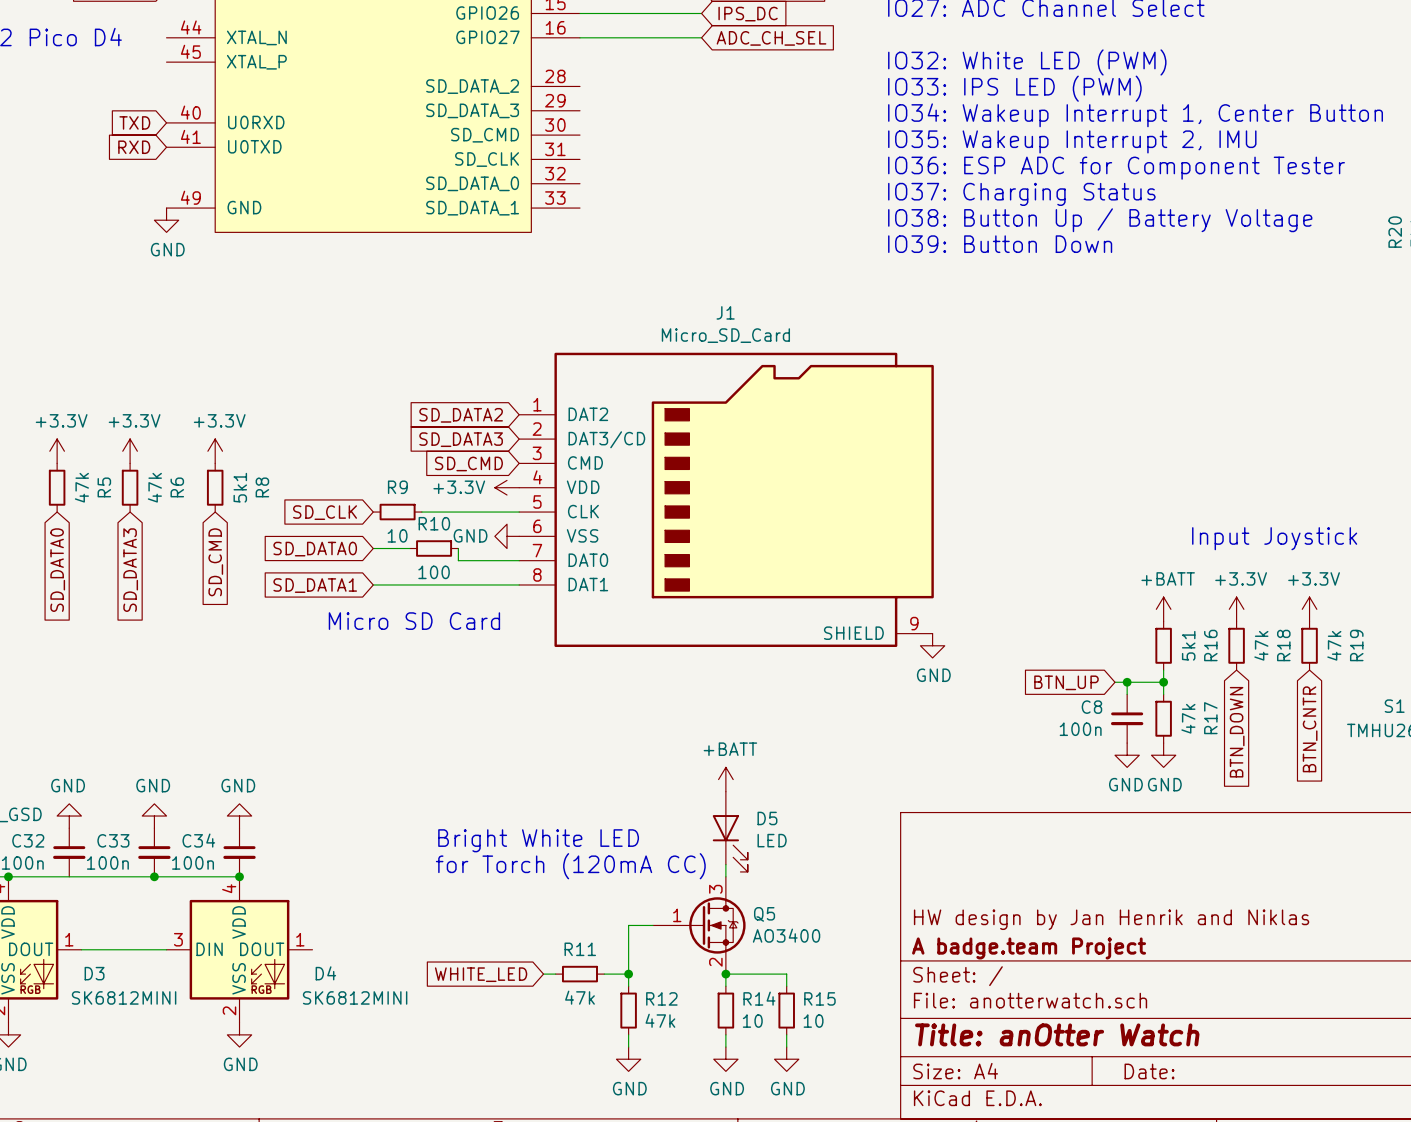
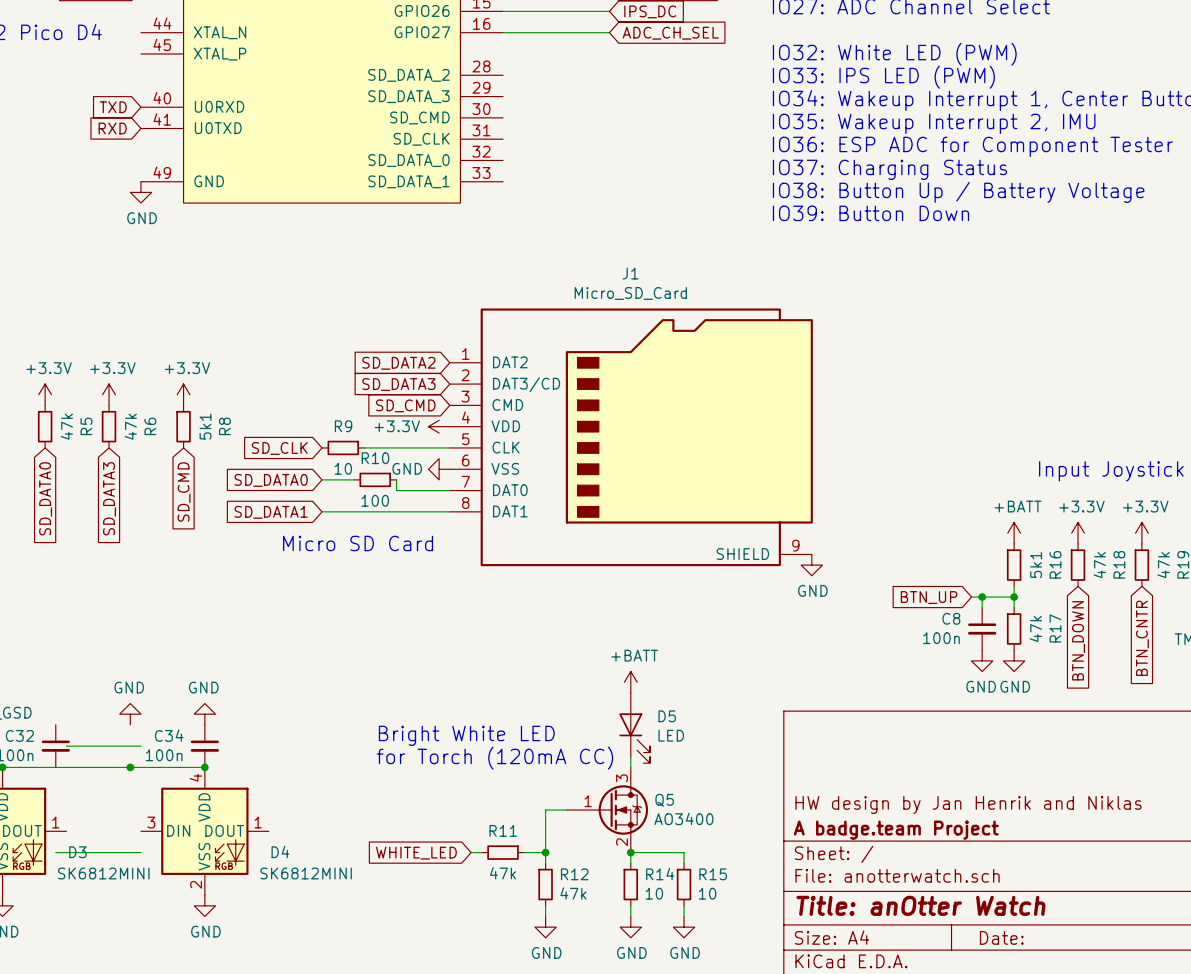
power symbol: GND (69, 816) -> none
C33: 100n (154, 852) -> none
wire: (81, 949) (166, 949) -> (66, 746) (140, 746)
wire: none -> (55, 852) (140, 852)

